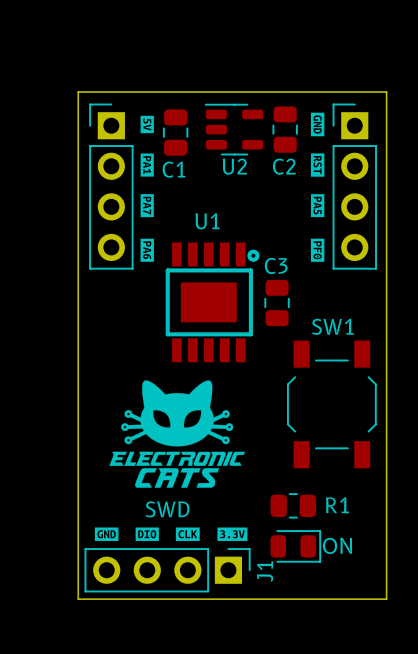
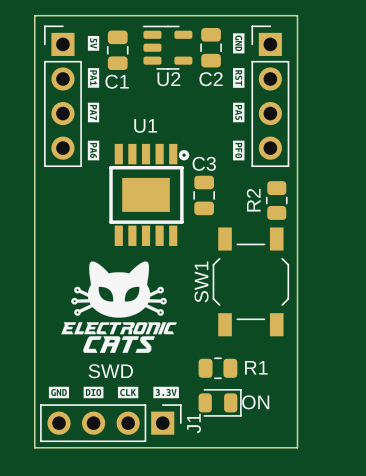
R2: none -> (276, 200)
SW1 name rotation: 0° (332, 326) -> 90° counterclockwise (201, 281)
SW1 name position: SW1 (332, 326) -> SW1 (201, 281)

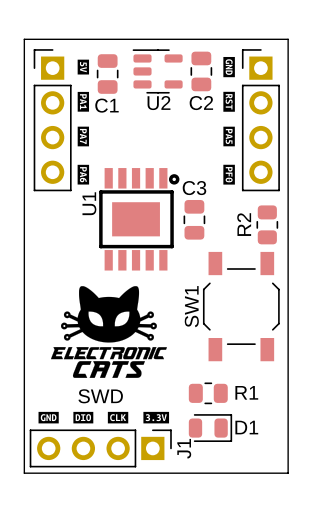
U1 name rotation: 0° (145, 125) -> 90° counterclockwise (89, 203)
U1 name position: U1 (145, 125) -> U1 (89, 203)
ON name: ON (255, 402) -> D1 (246, 427)

